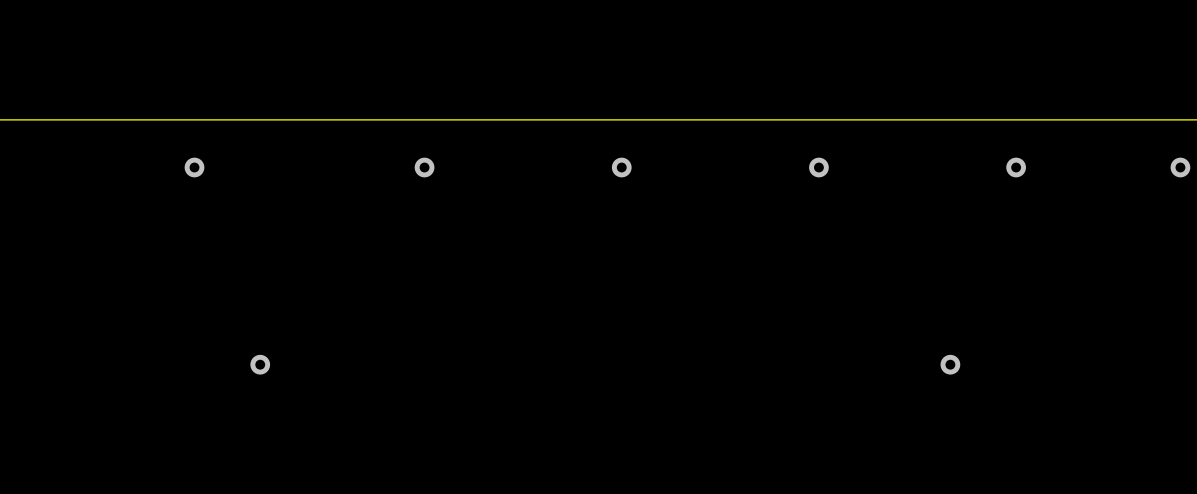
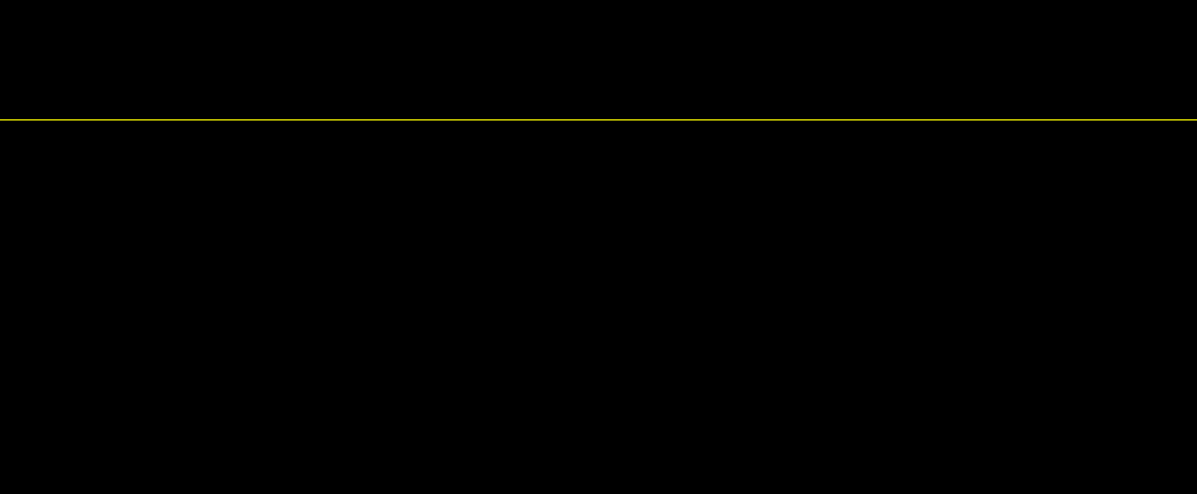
via: (194, 167) -> none
via: (424, 167) -> none
via: (621, 167) -> none
via: (818, 167) -> none
via: (1016, 167) -> none
via: (1180, 167) -> none
via: (260, 364) -> none
via: (950, 364) -> none

